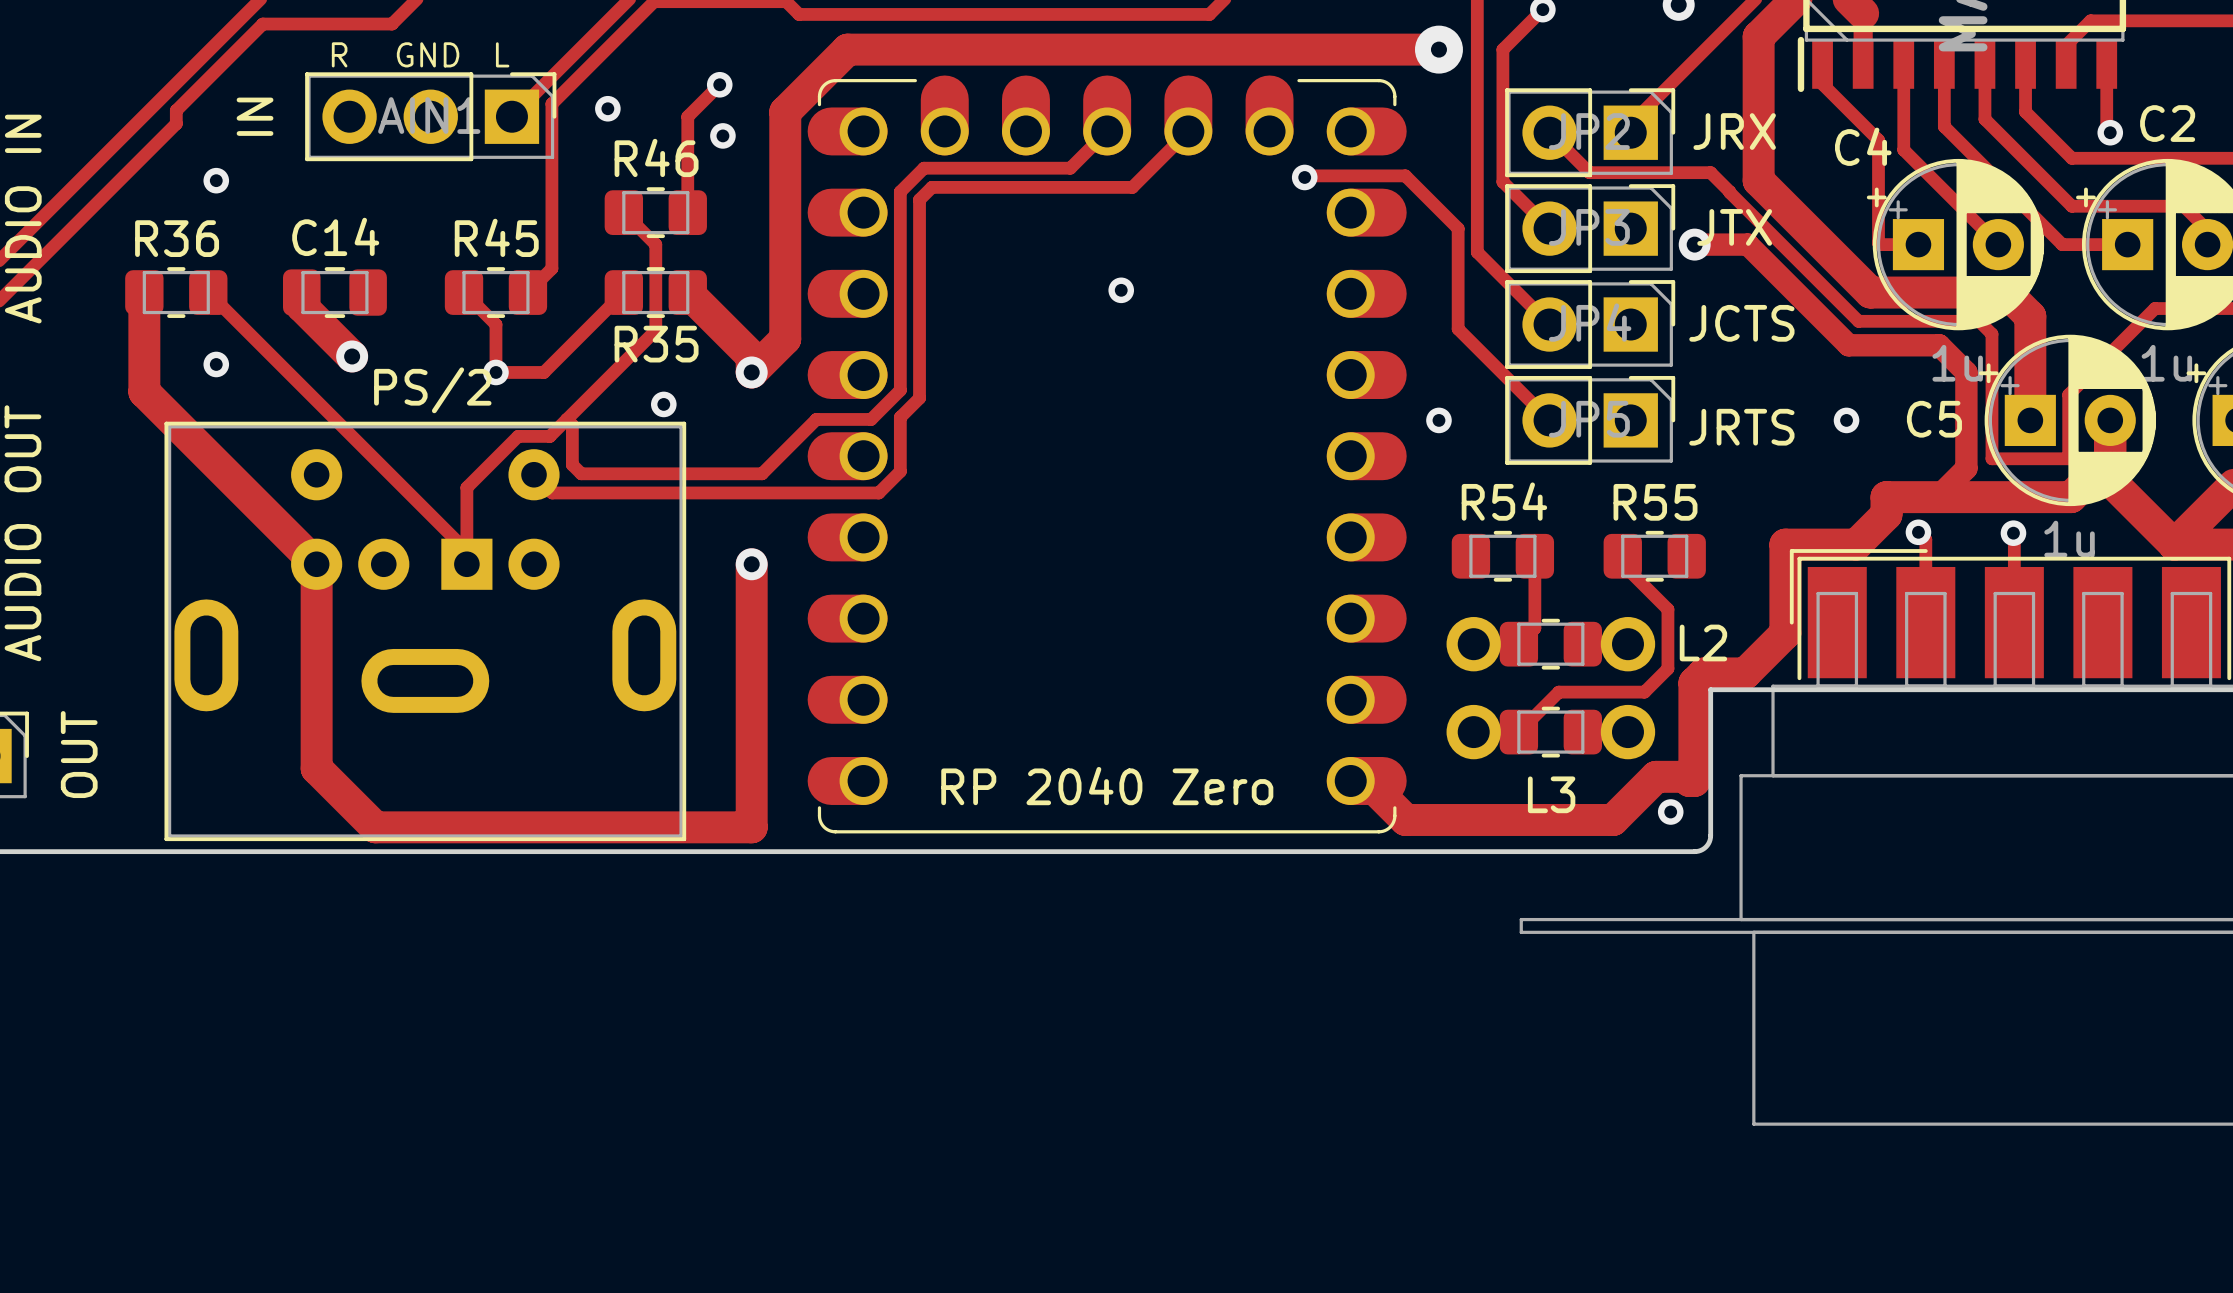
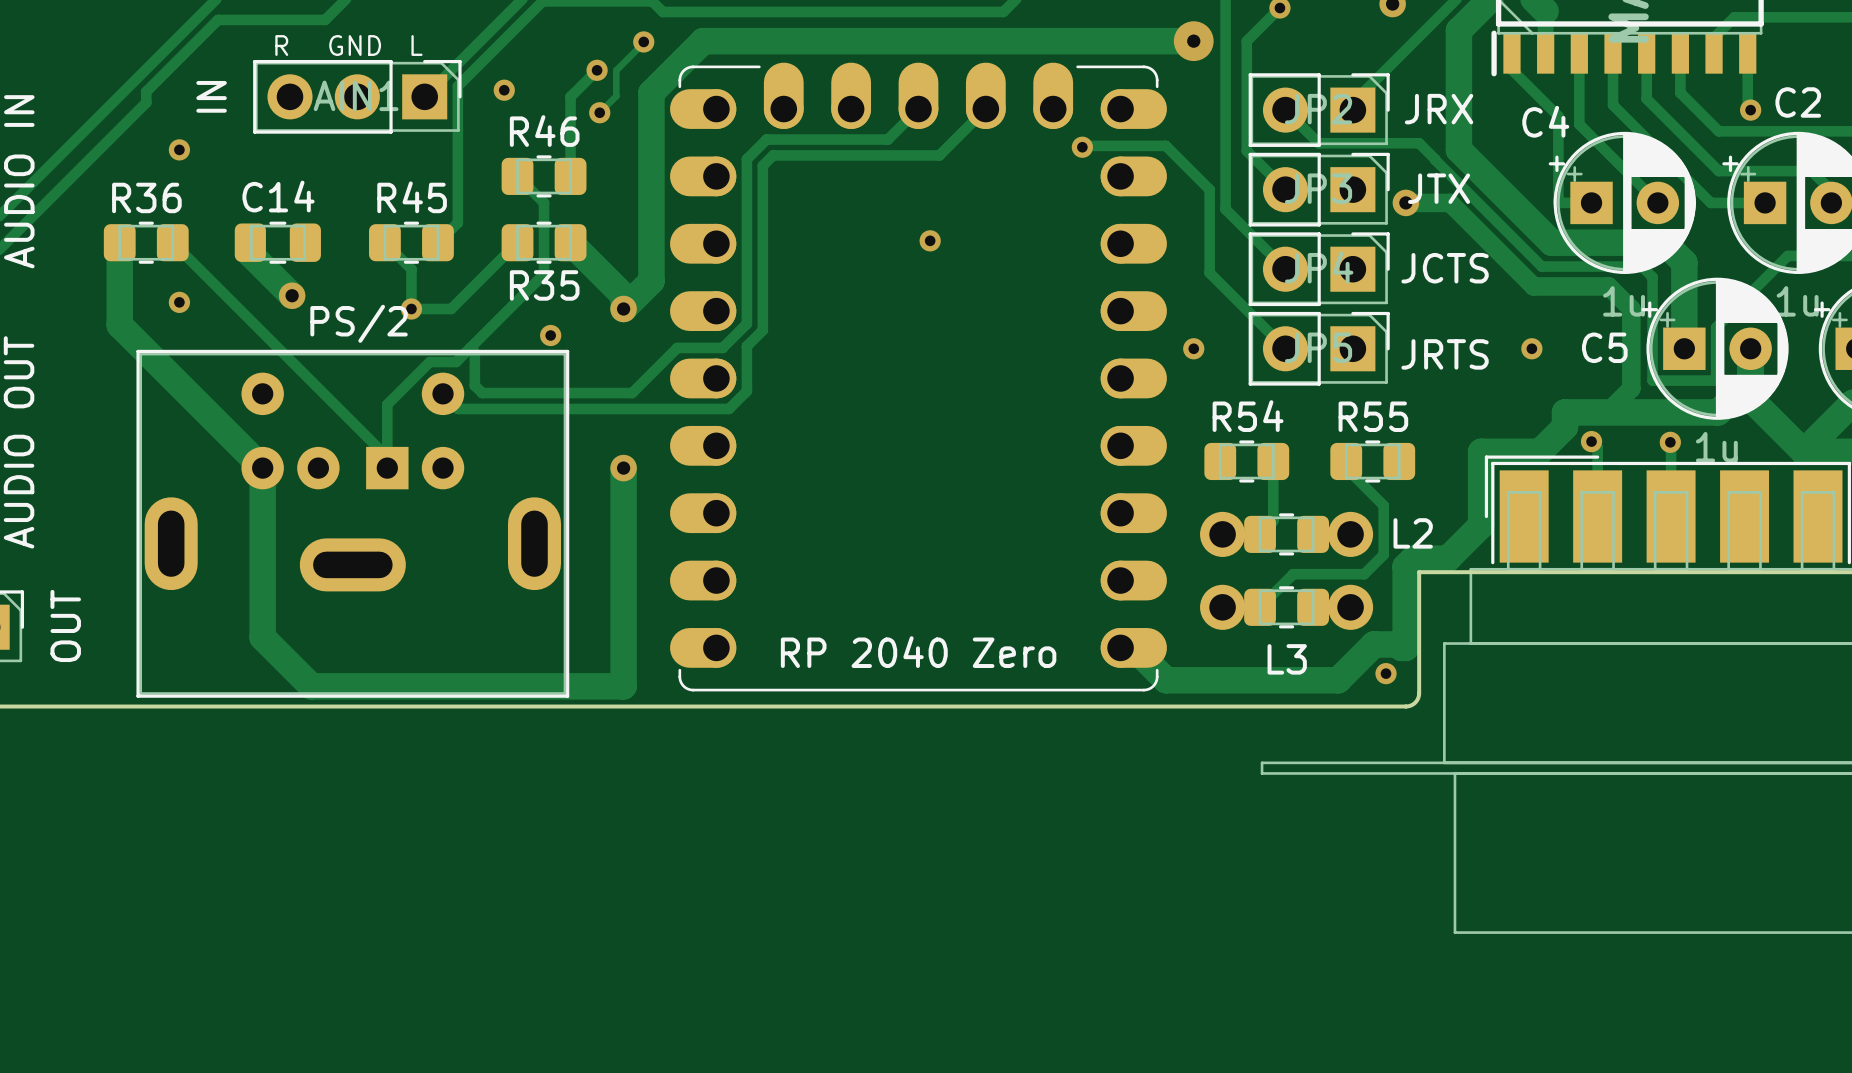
via: none -> (643, 41)
track: none -> (643, 43) (644, 41) (616, 70) (616, 96) (599, 112)

